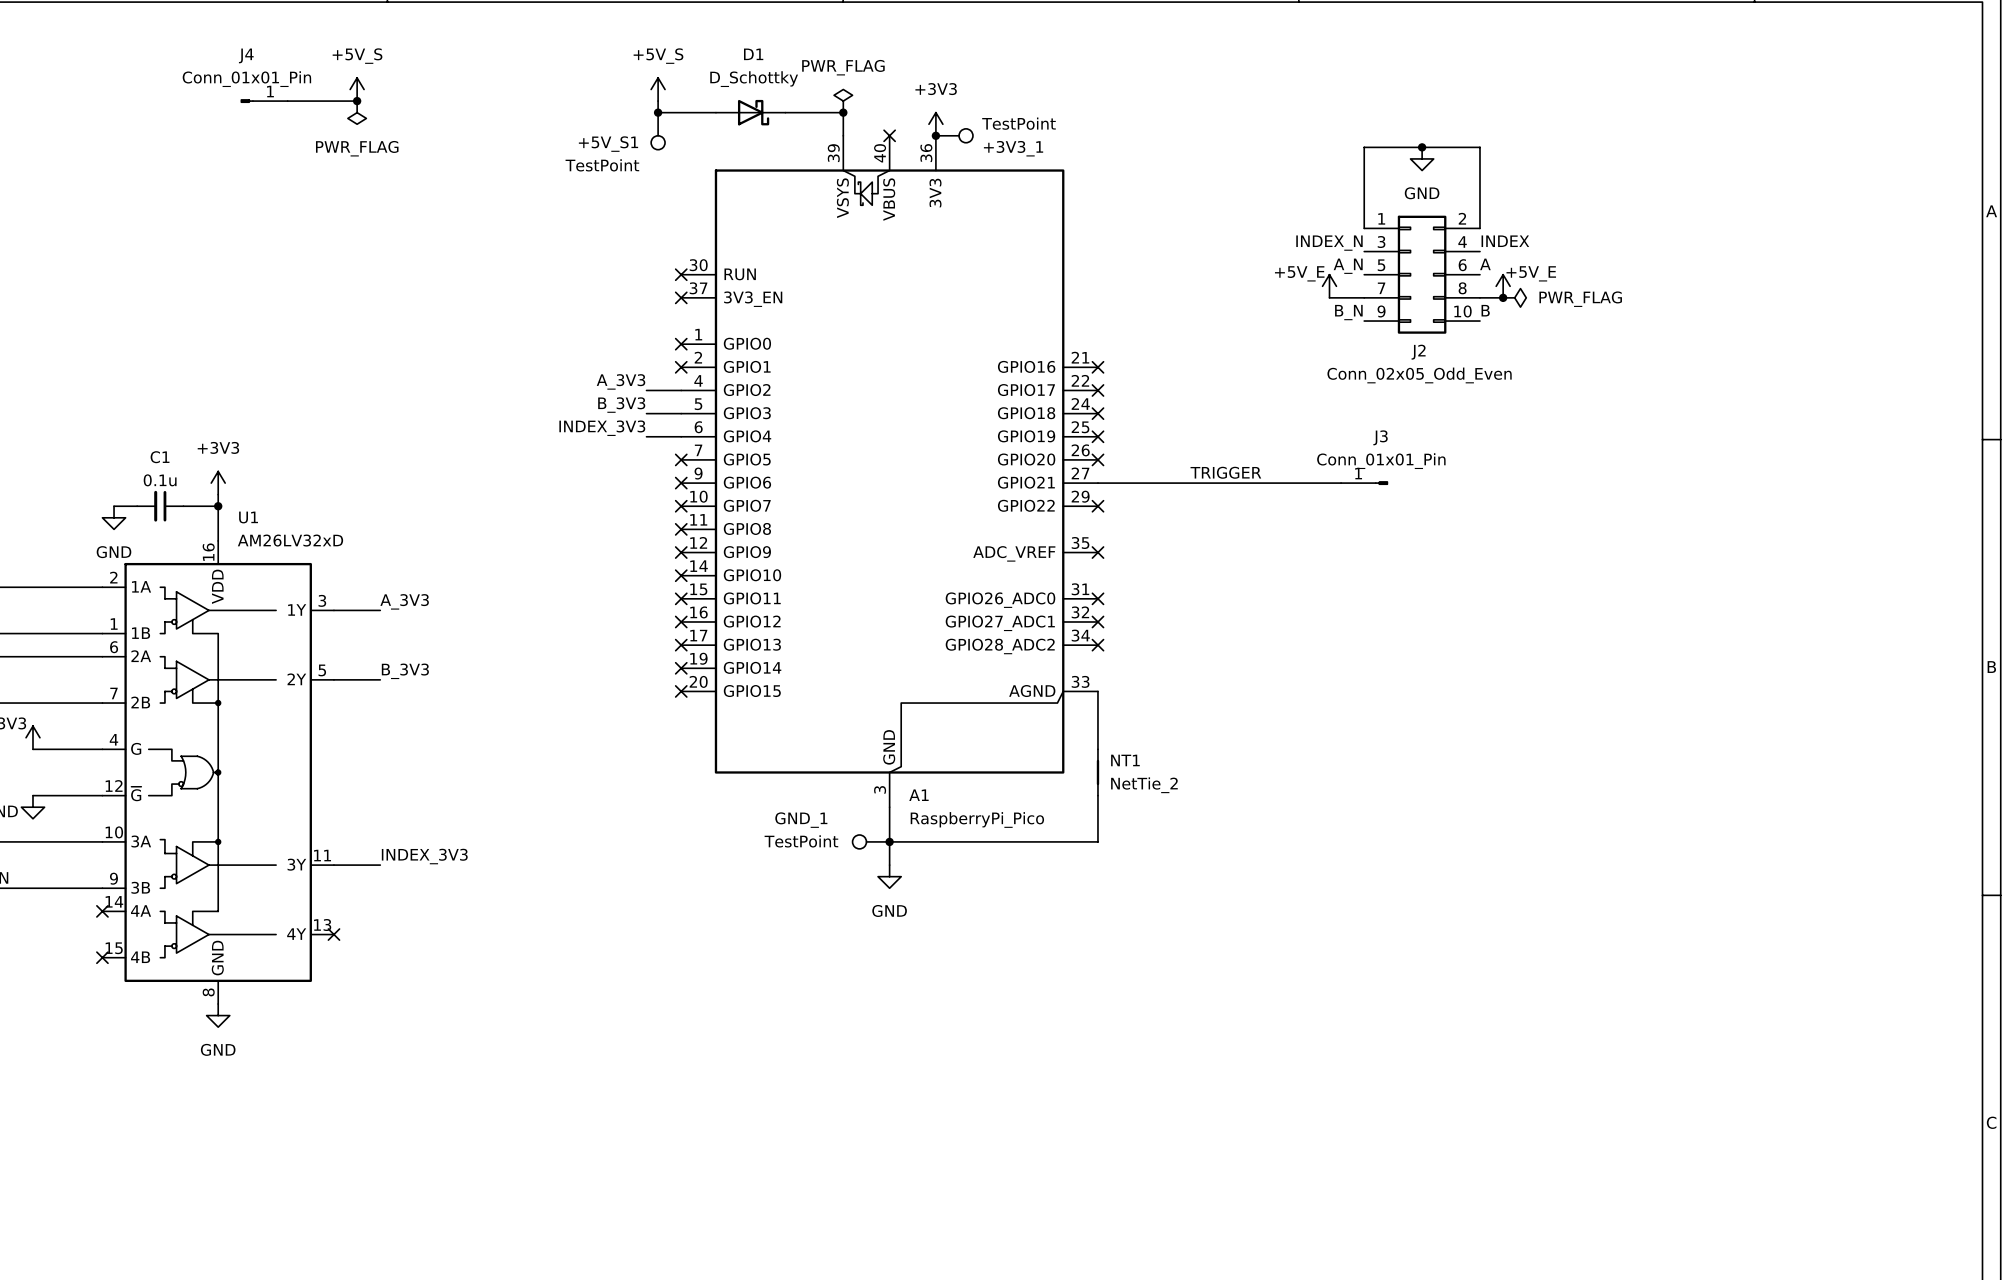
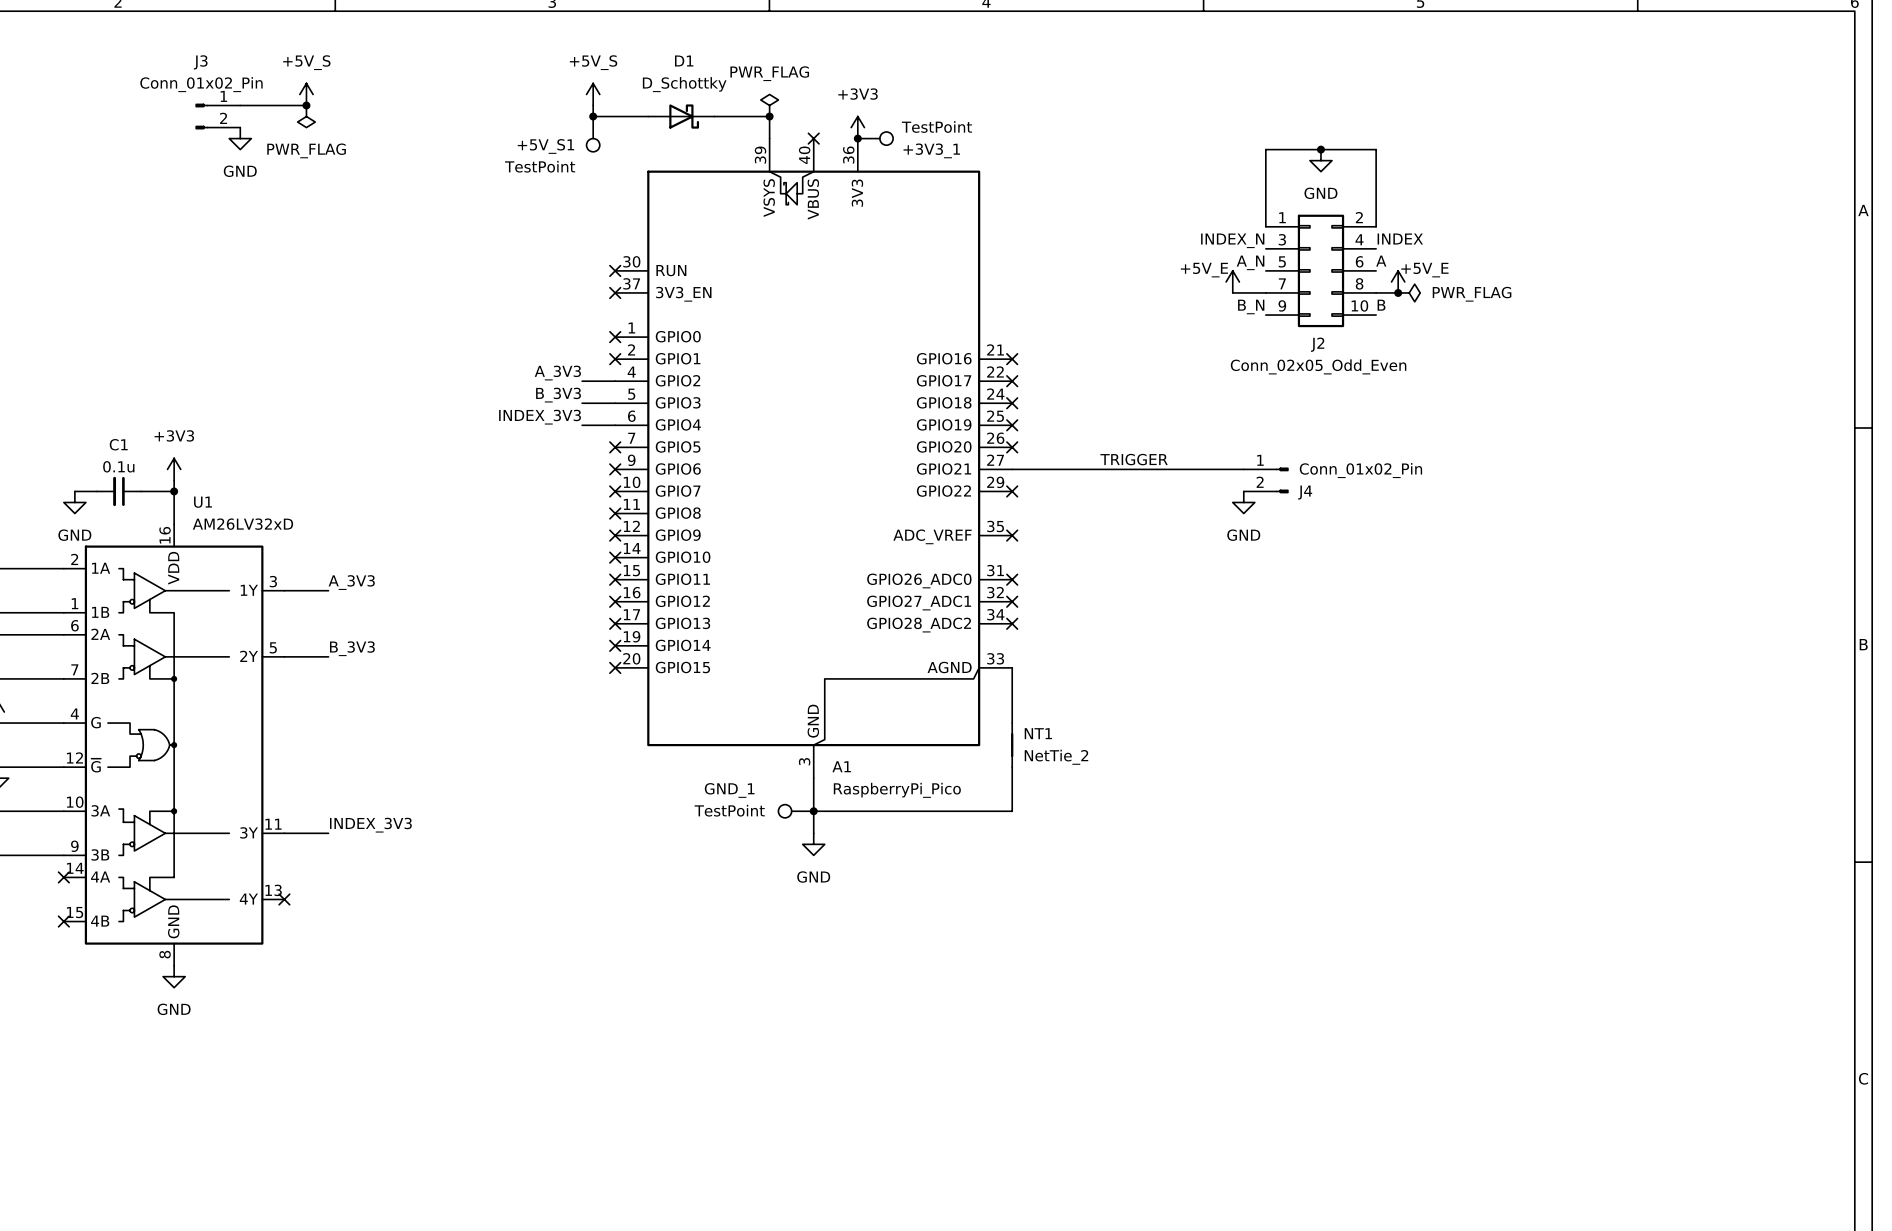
J4 name position: J4 (246, 55) -> J4 (1305, 492)
J4 value: Conn_01x01_Pin (246, 79) -> Conn_01x02_Pin (1360, 470)
J4 symbol: [240, 99, 288, 103] -> [1243, 467, 1289, 494]
power symbol: none -> GND (240, 138)
J3 name position: J3 (1380, 437) -> J3 (200, 62)
J3 value: Conn_01x01_Pin (1381, 461) -> Conn_01x02_Pin (201, 84)
J3 symbol: [1341, 481, 1389, 485] -> [195, 103, 241, 130]
power symbol: none -> GND (1243, 502)

